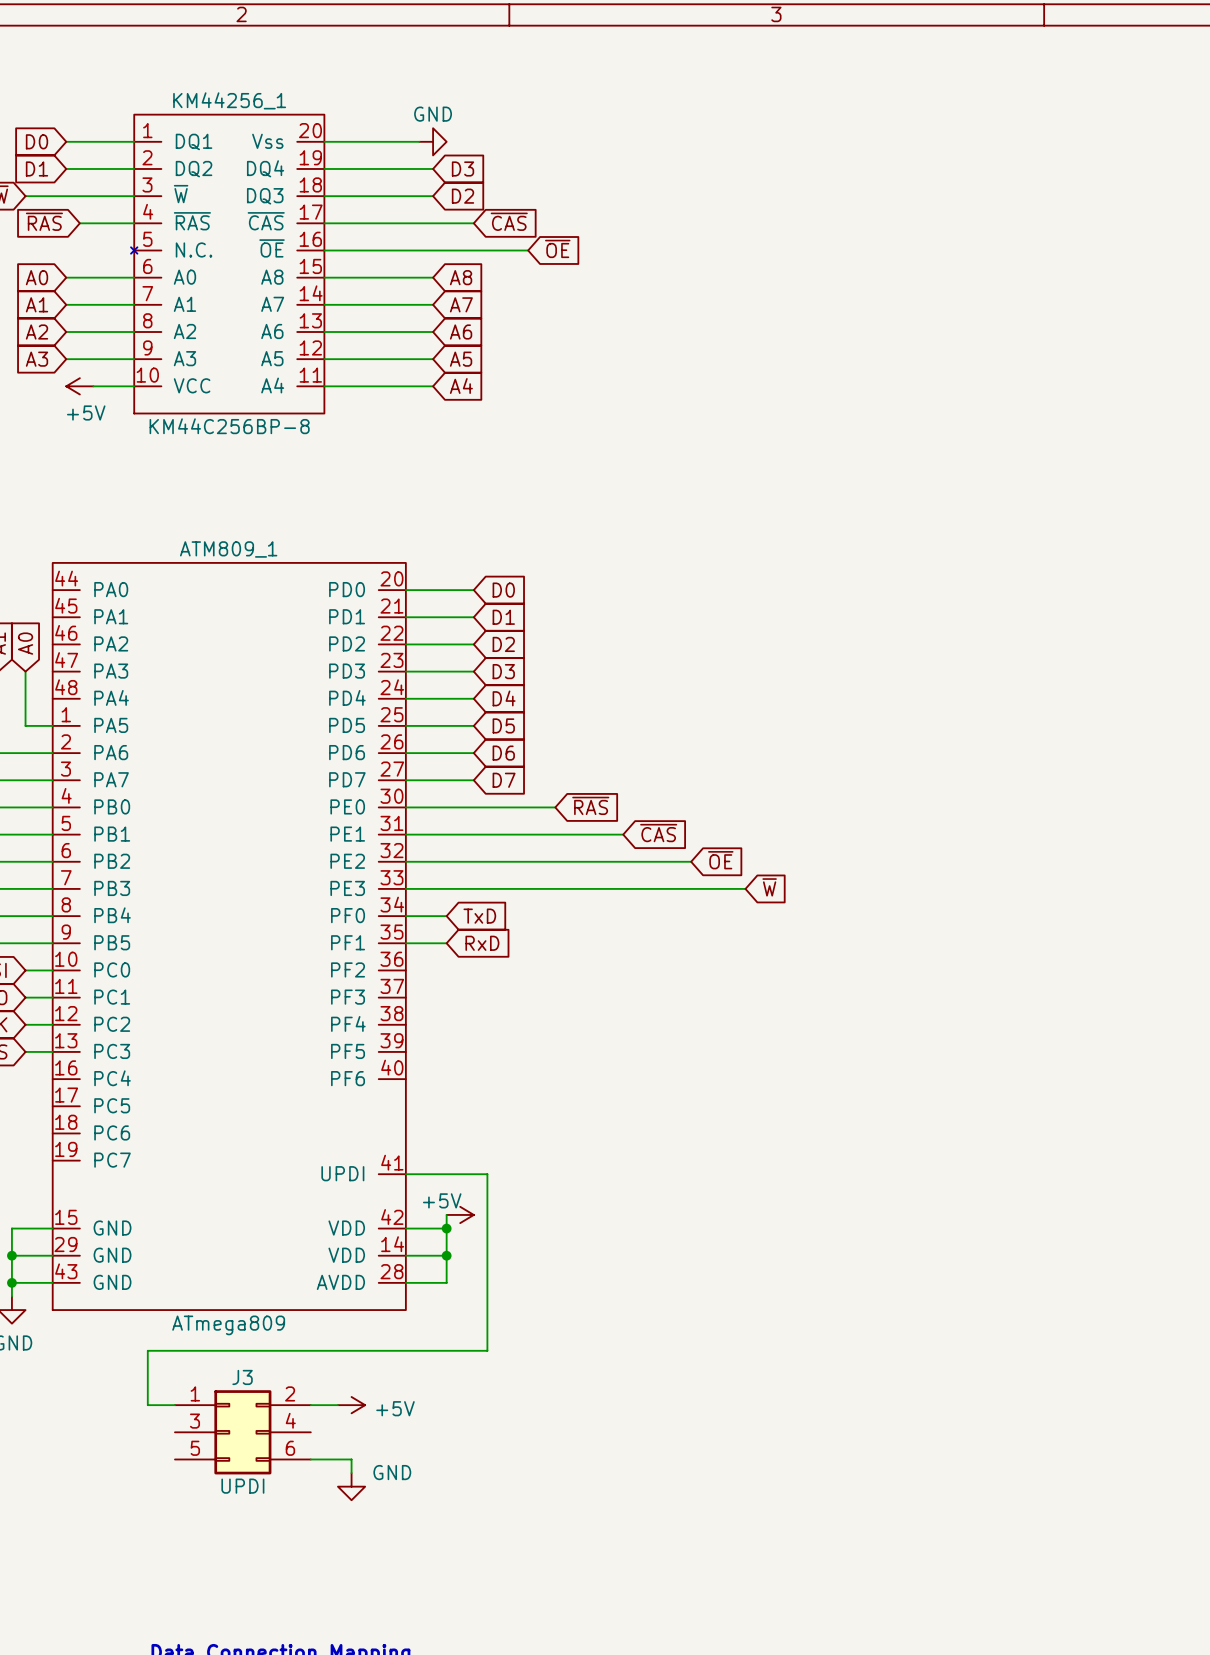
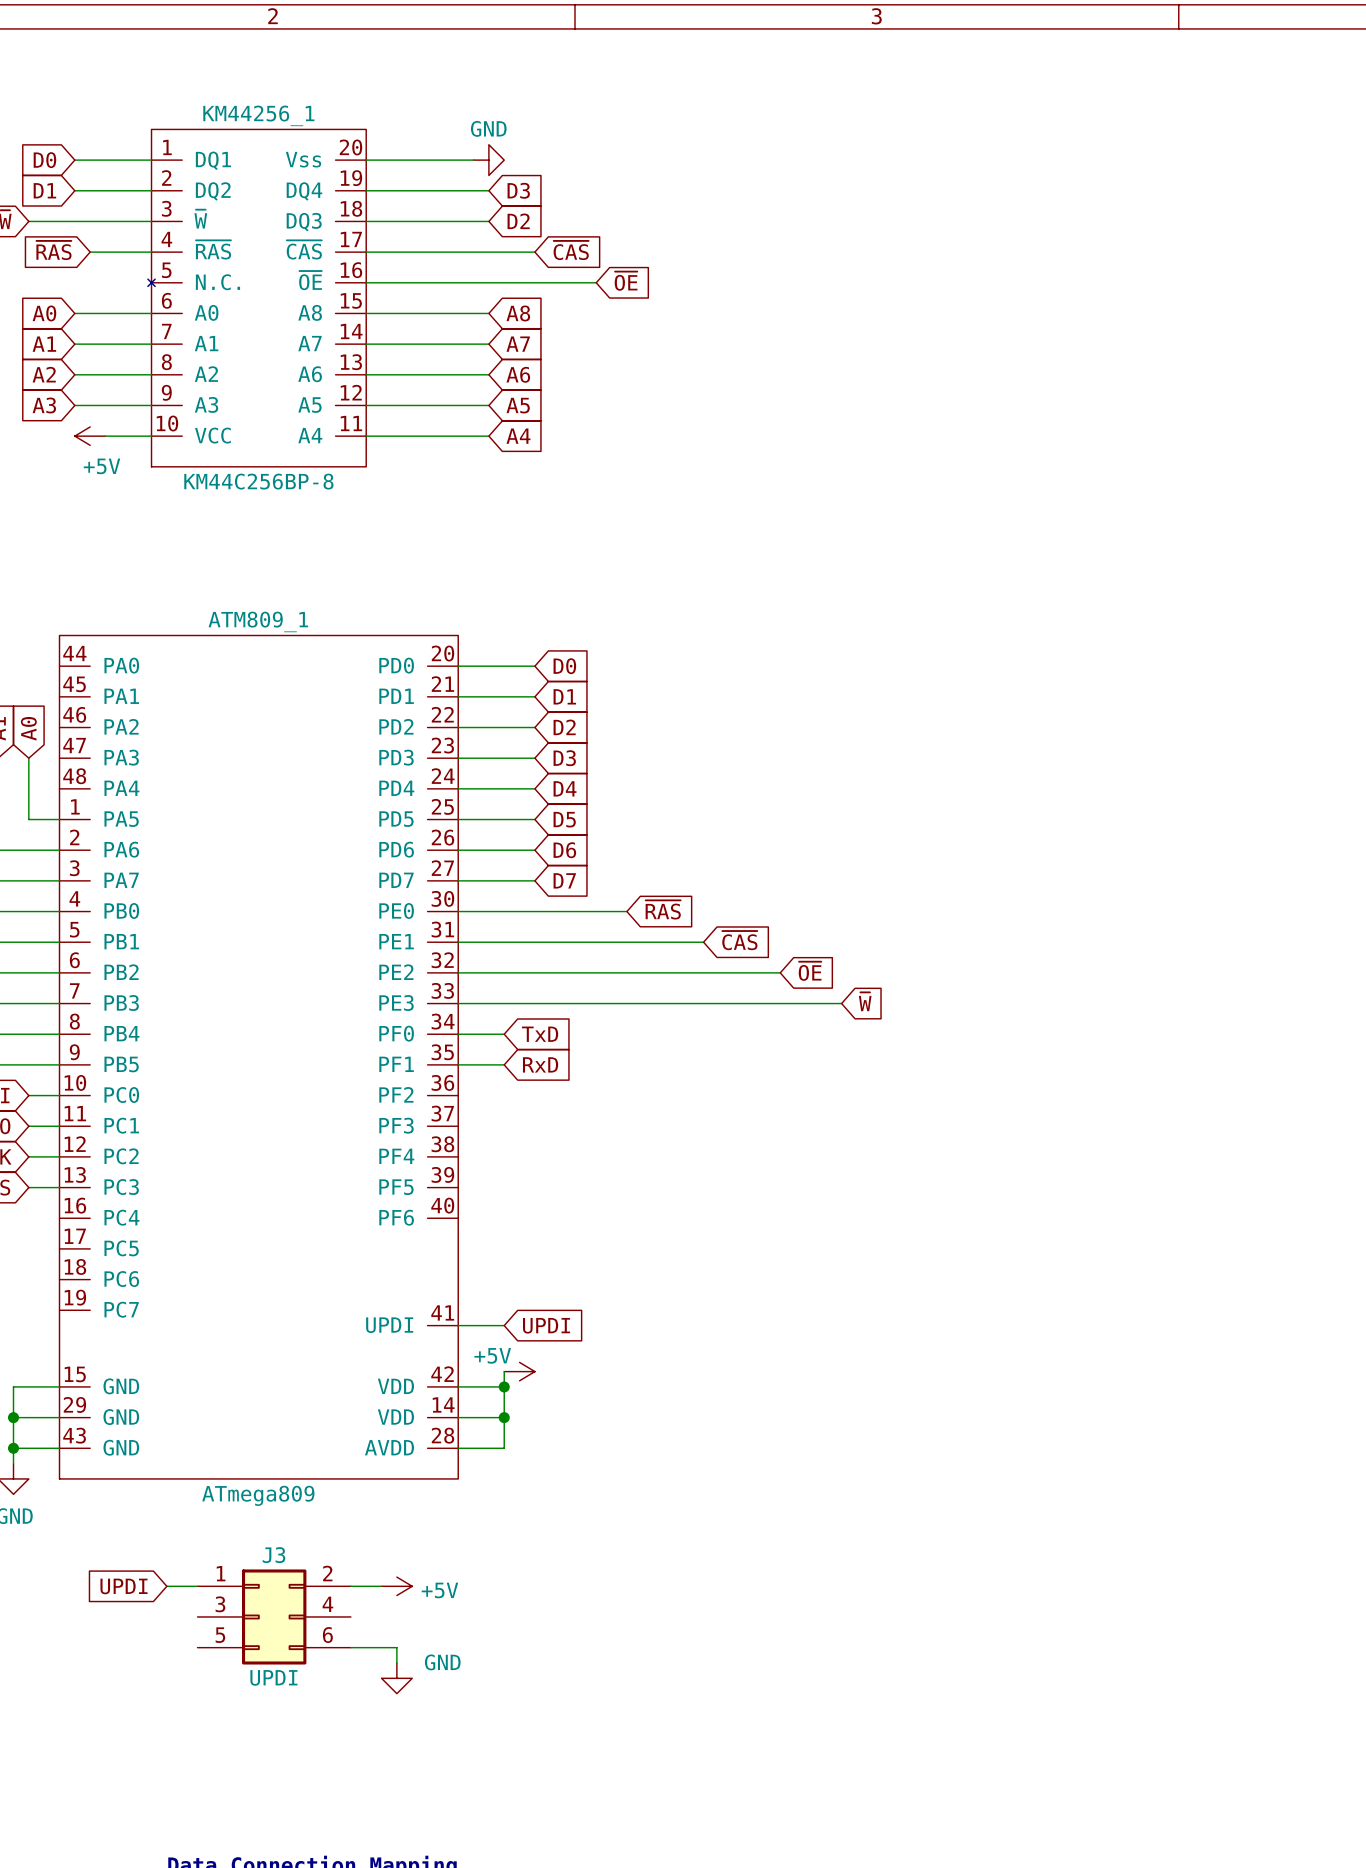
wire: (446, 1174) (487, 1174) (487, 1350) (147, 1350) (147, 1405) -> none
global label: none -> UPDI (546, 1325)
global label: none -> UPDI (123, 1586)

